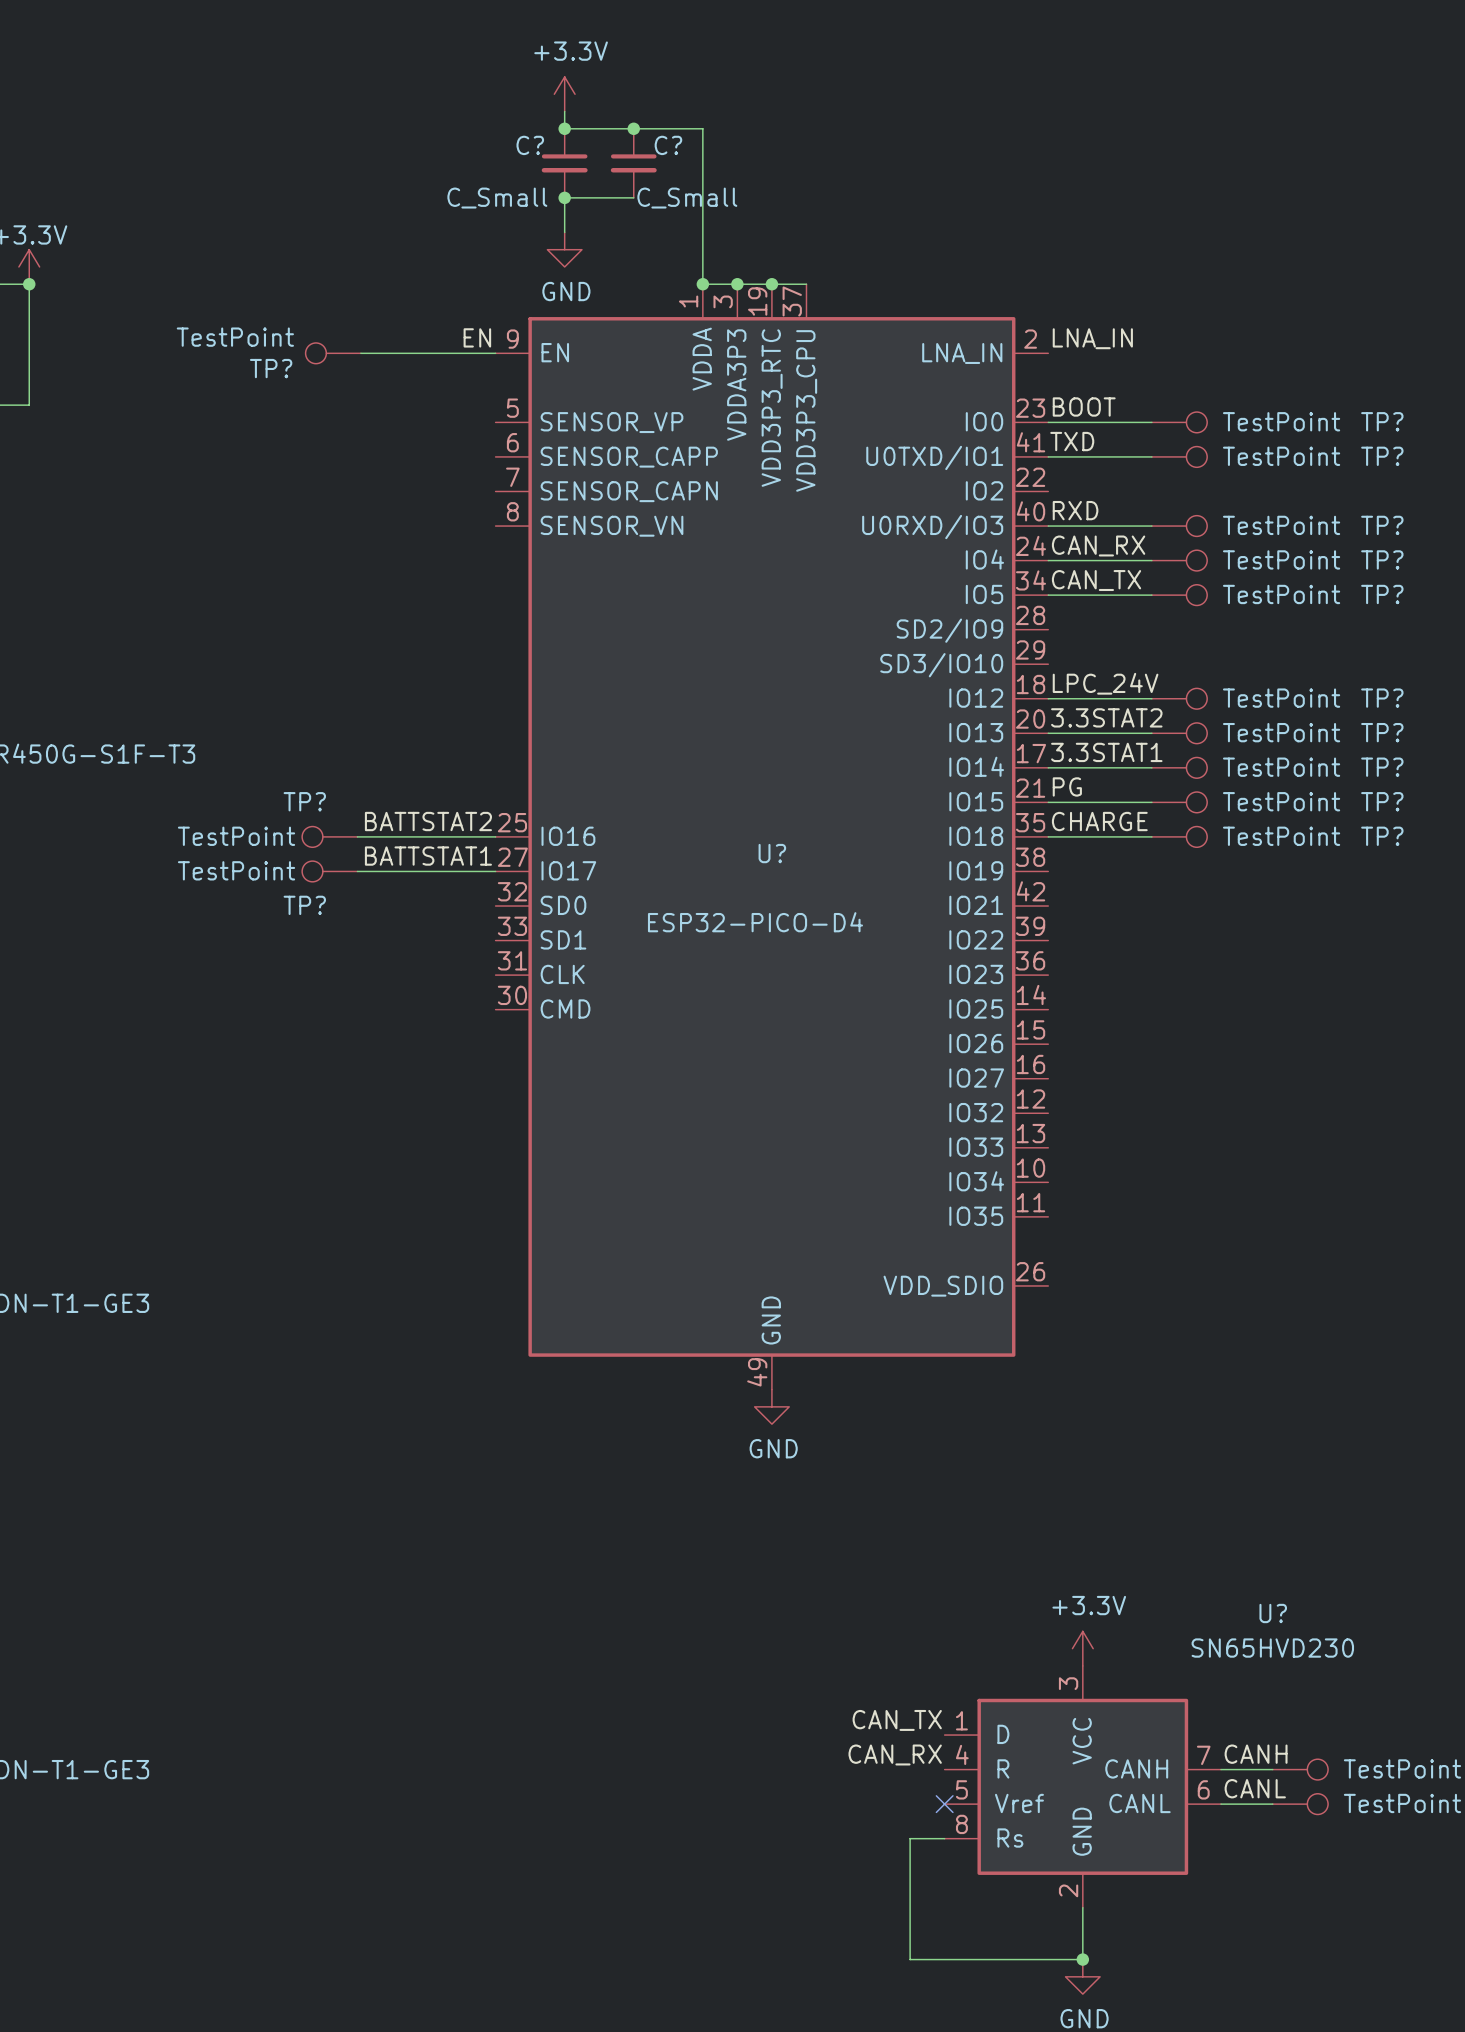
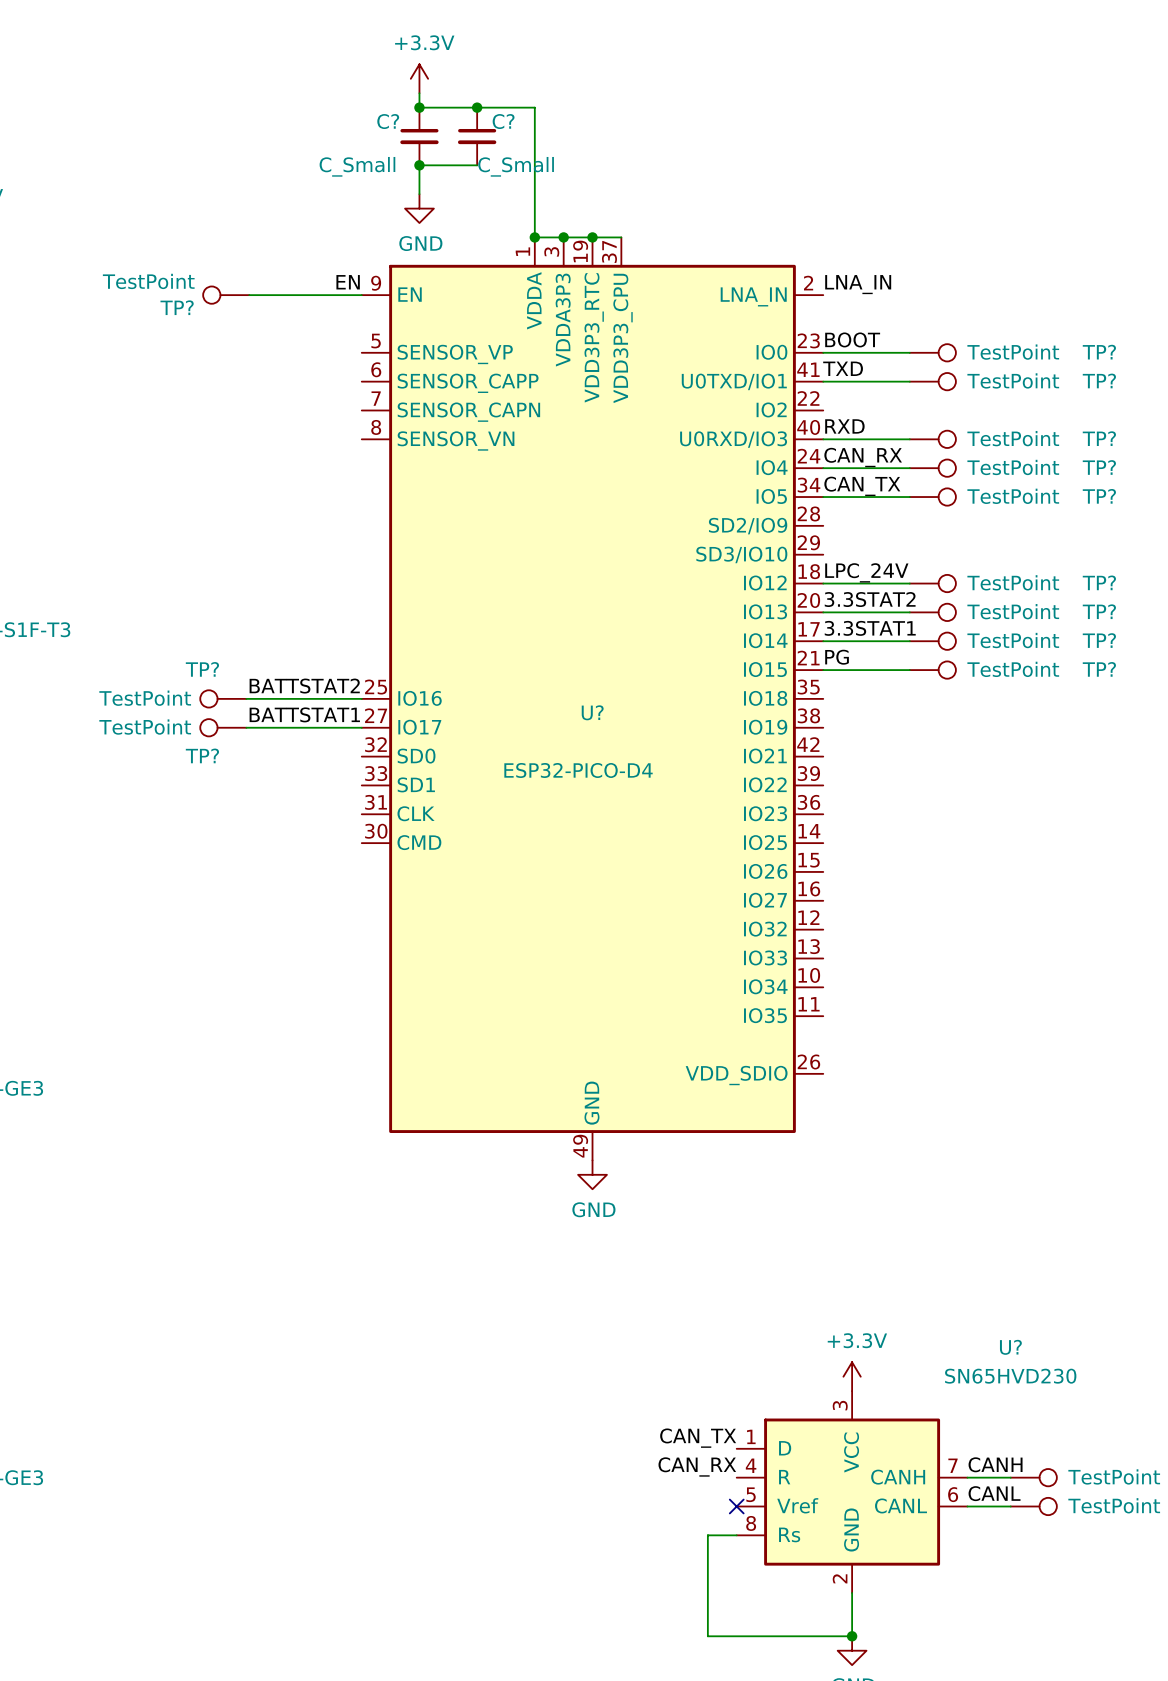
label: CHARGE (1099, 821) -> none
wire: (1048, 836) (1151, 836) -> none
TP?: TestPoint (1179, 836) -> none

